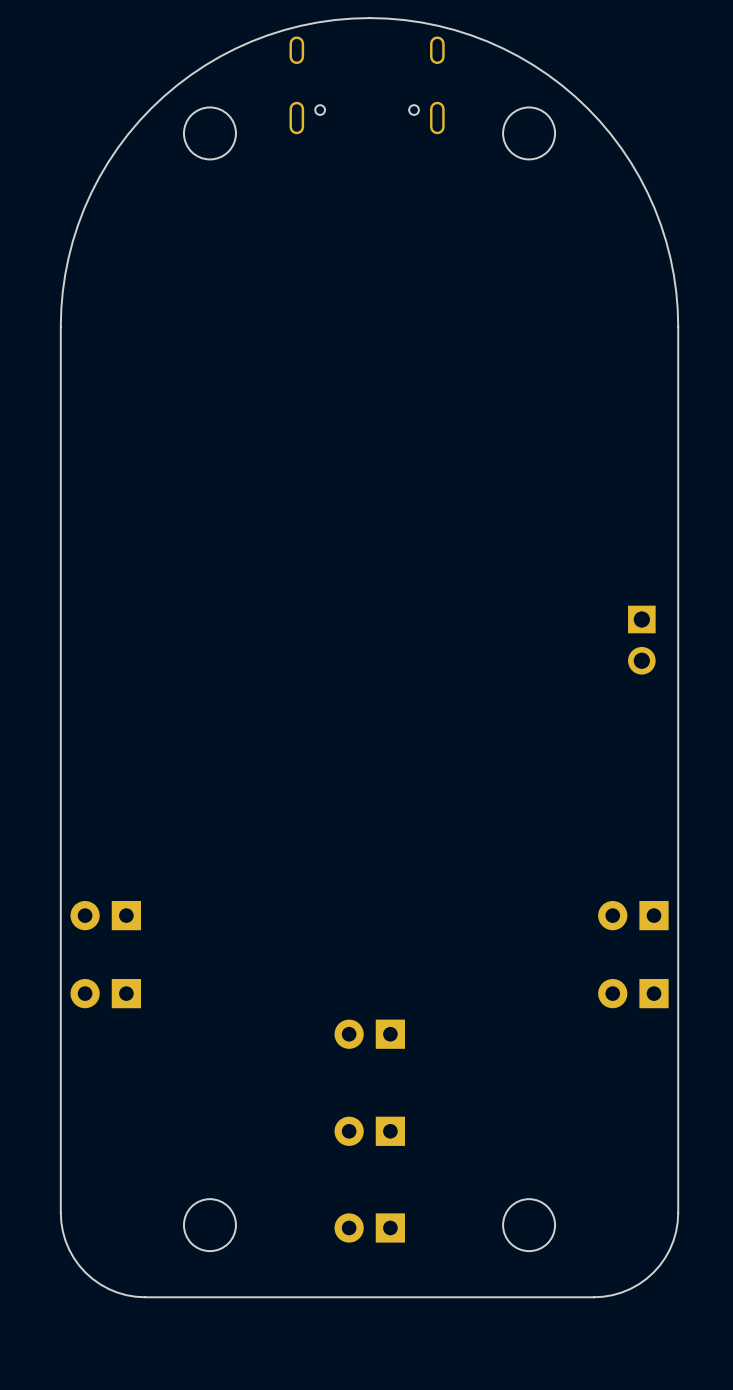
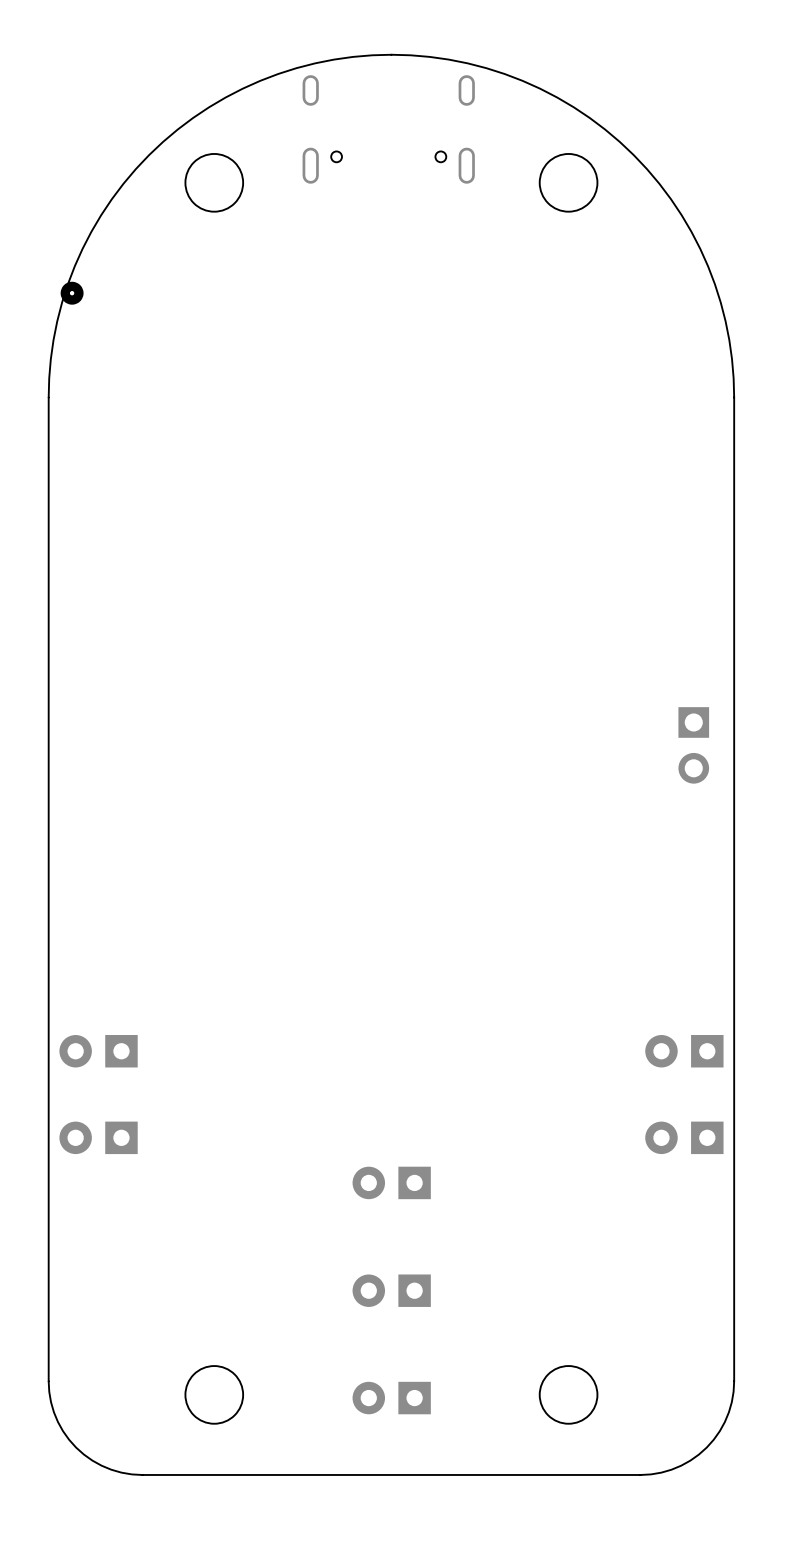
part: none -> (72, 293)

